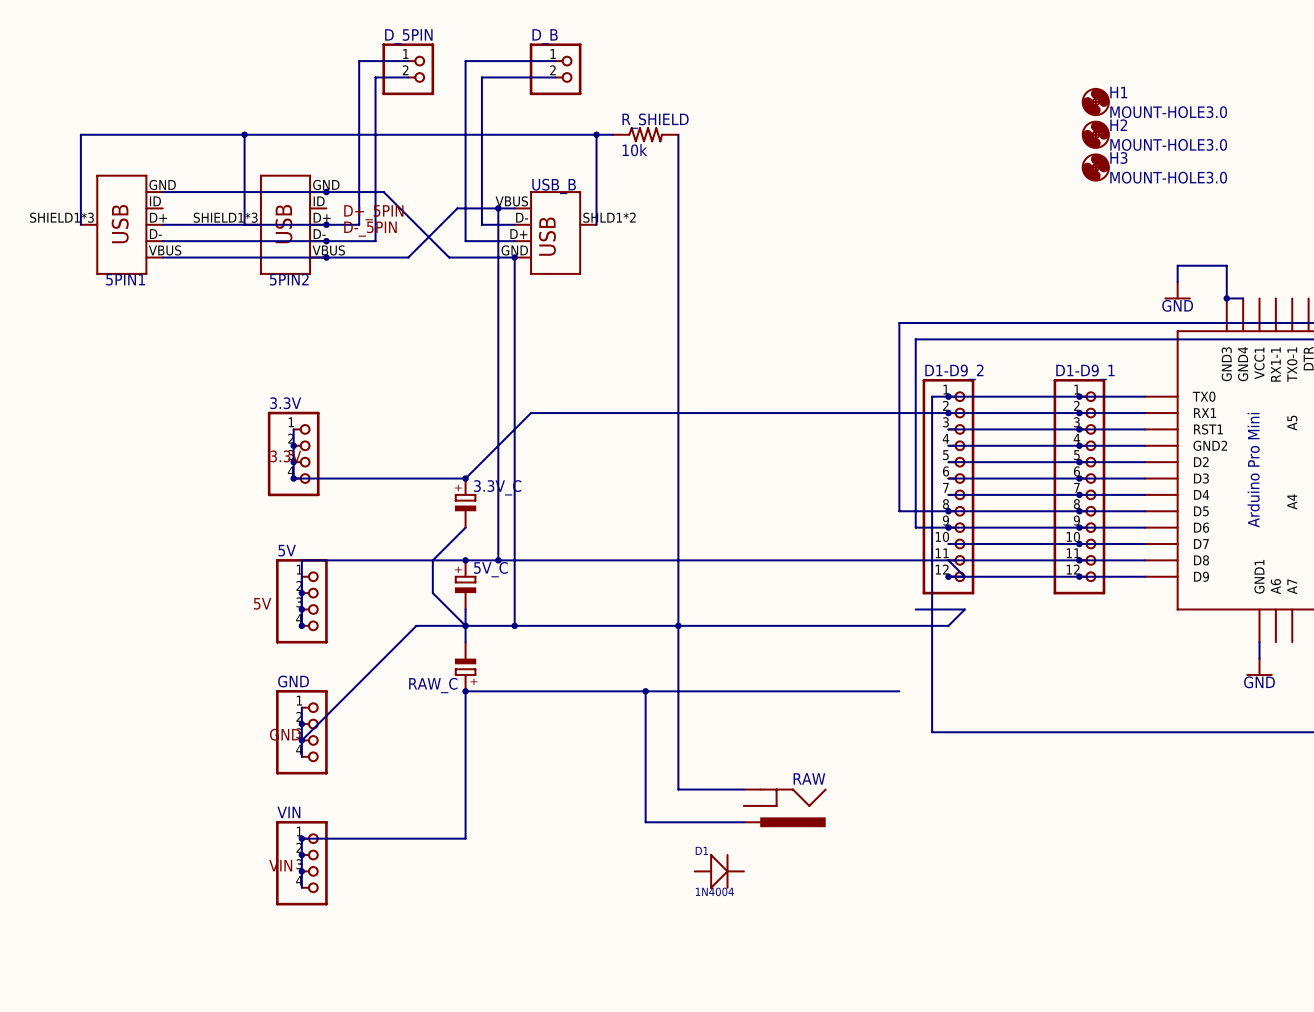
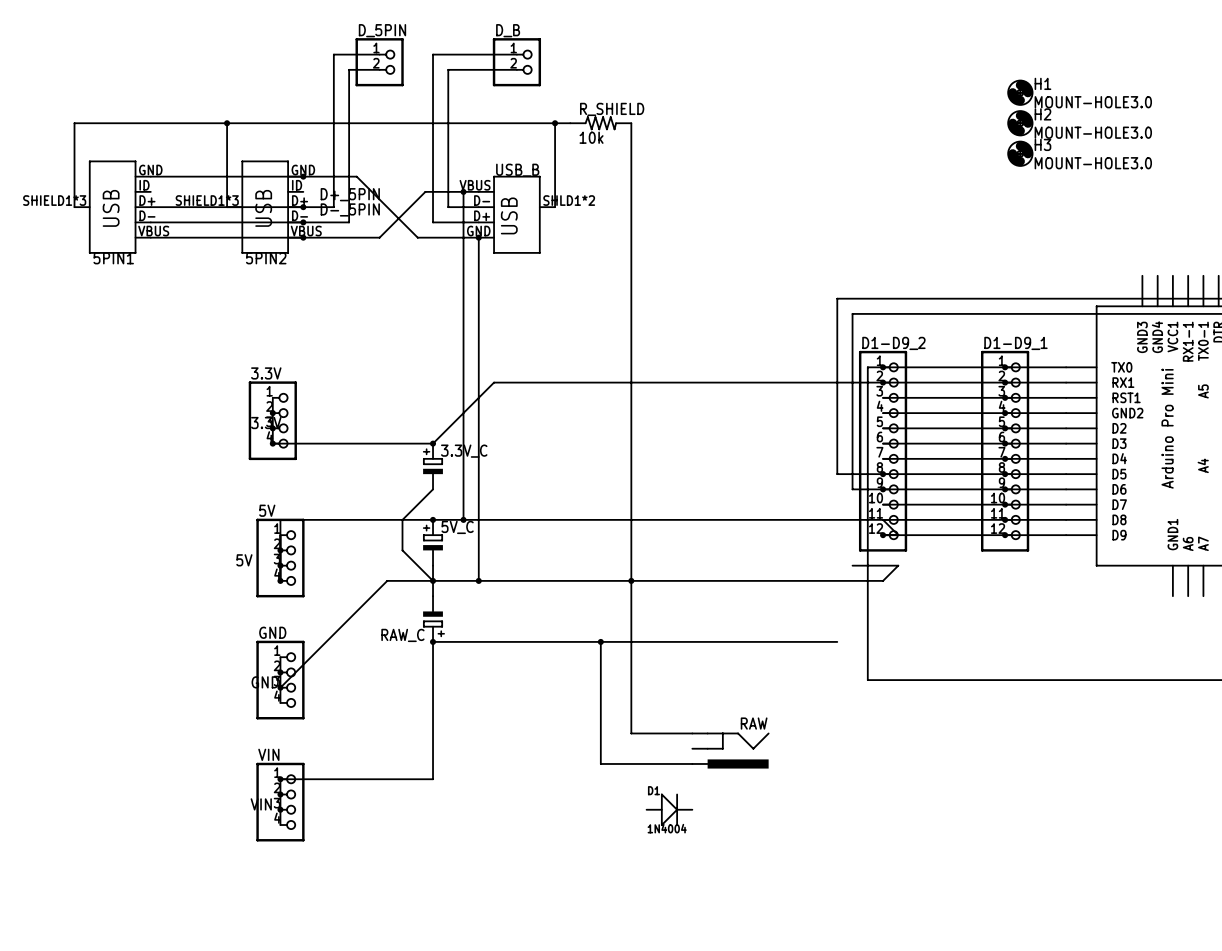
wire: (1177, 282) (1177, 265) (1226, 265) (1226, 298) (1243, 298) -> none
power symbol: GND (1177, 290) -> none
junction: (1226, 298) -> none
wire: (1259, 642) (1259, 658) -> none
power symbol: GND (1259, 667) -> none

